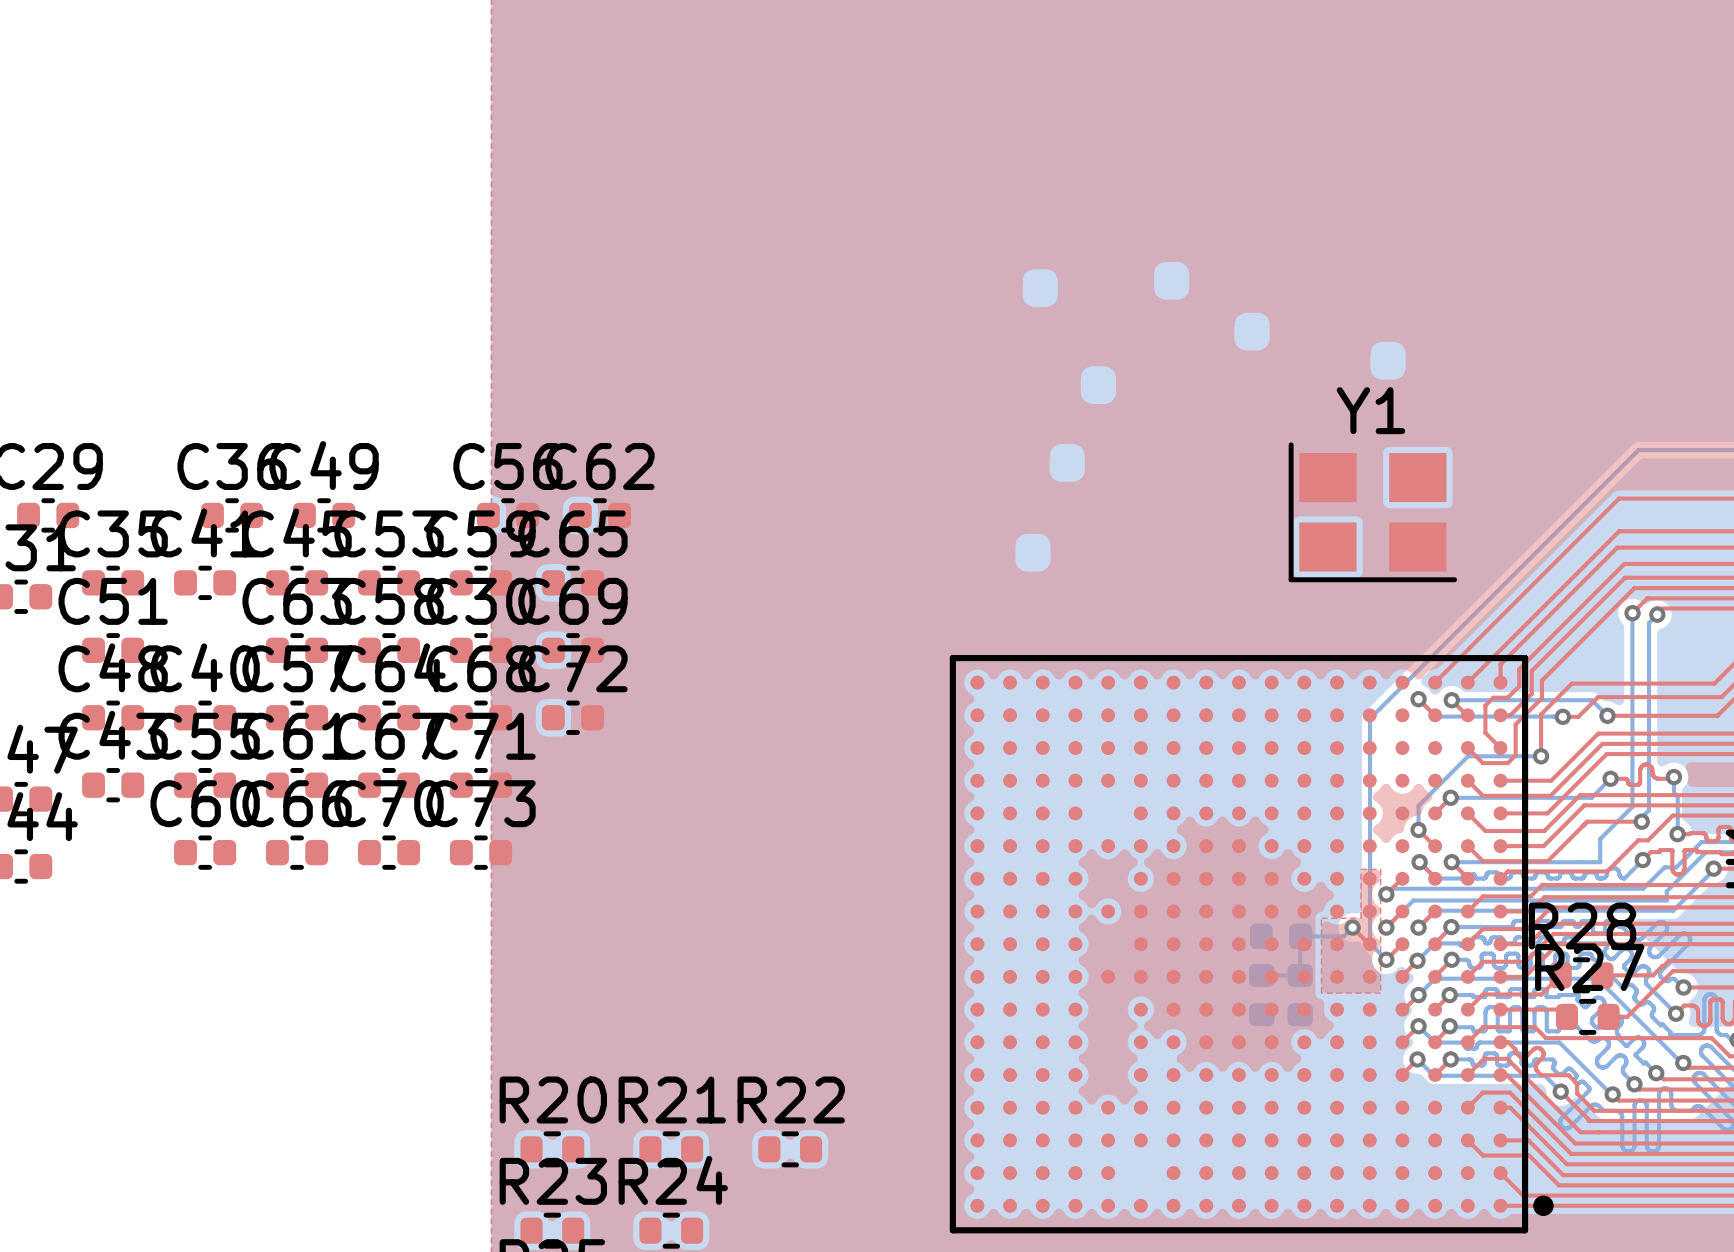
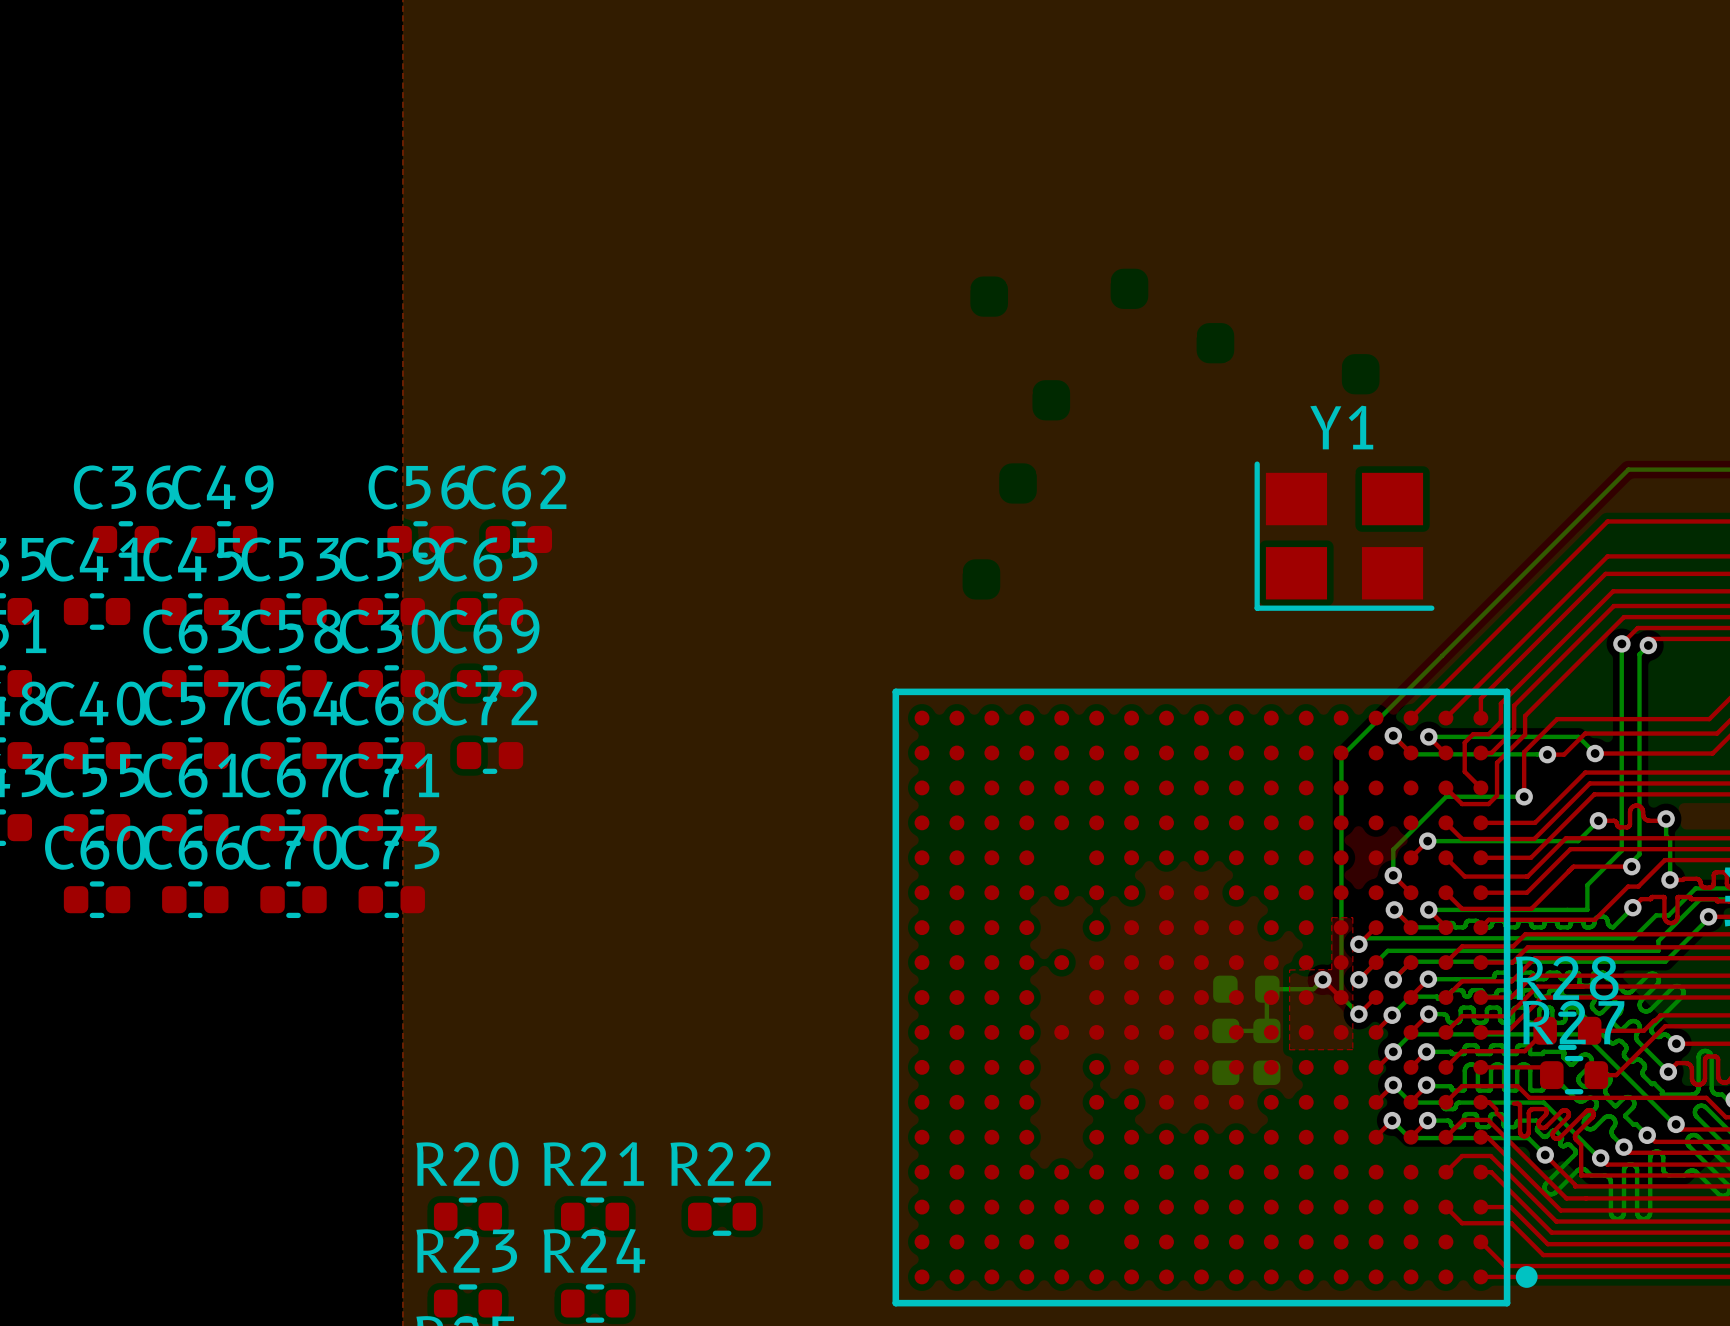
top track: none -> (1514, 1103) (1517, 1103)
top track: (1523, 1059) (1534, 1048) (1540, 1048) (1543, 1054) (1536, 1065) (1537, 1071) (1541, 1075) (1568, 1075) (1577, 1083) (1577, 1093) (1594, 1110) -> (1520, 1106) (1520, 1132) (1524, 1136) (1528, 1132) (1528, 1113) (1531, 1109) (1545, 1109) (1545, 1114) (1538, 1123) (1542, 1128) (1562, 1110) (1567, 1111) (1568, 1116) (1552, 1133) (1553, 1136) (1556, 1138) (1586, 1110) (1592, 1111) (1592, 1116) (1574, 1136) (1581, 1144) (1581, 1175)

